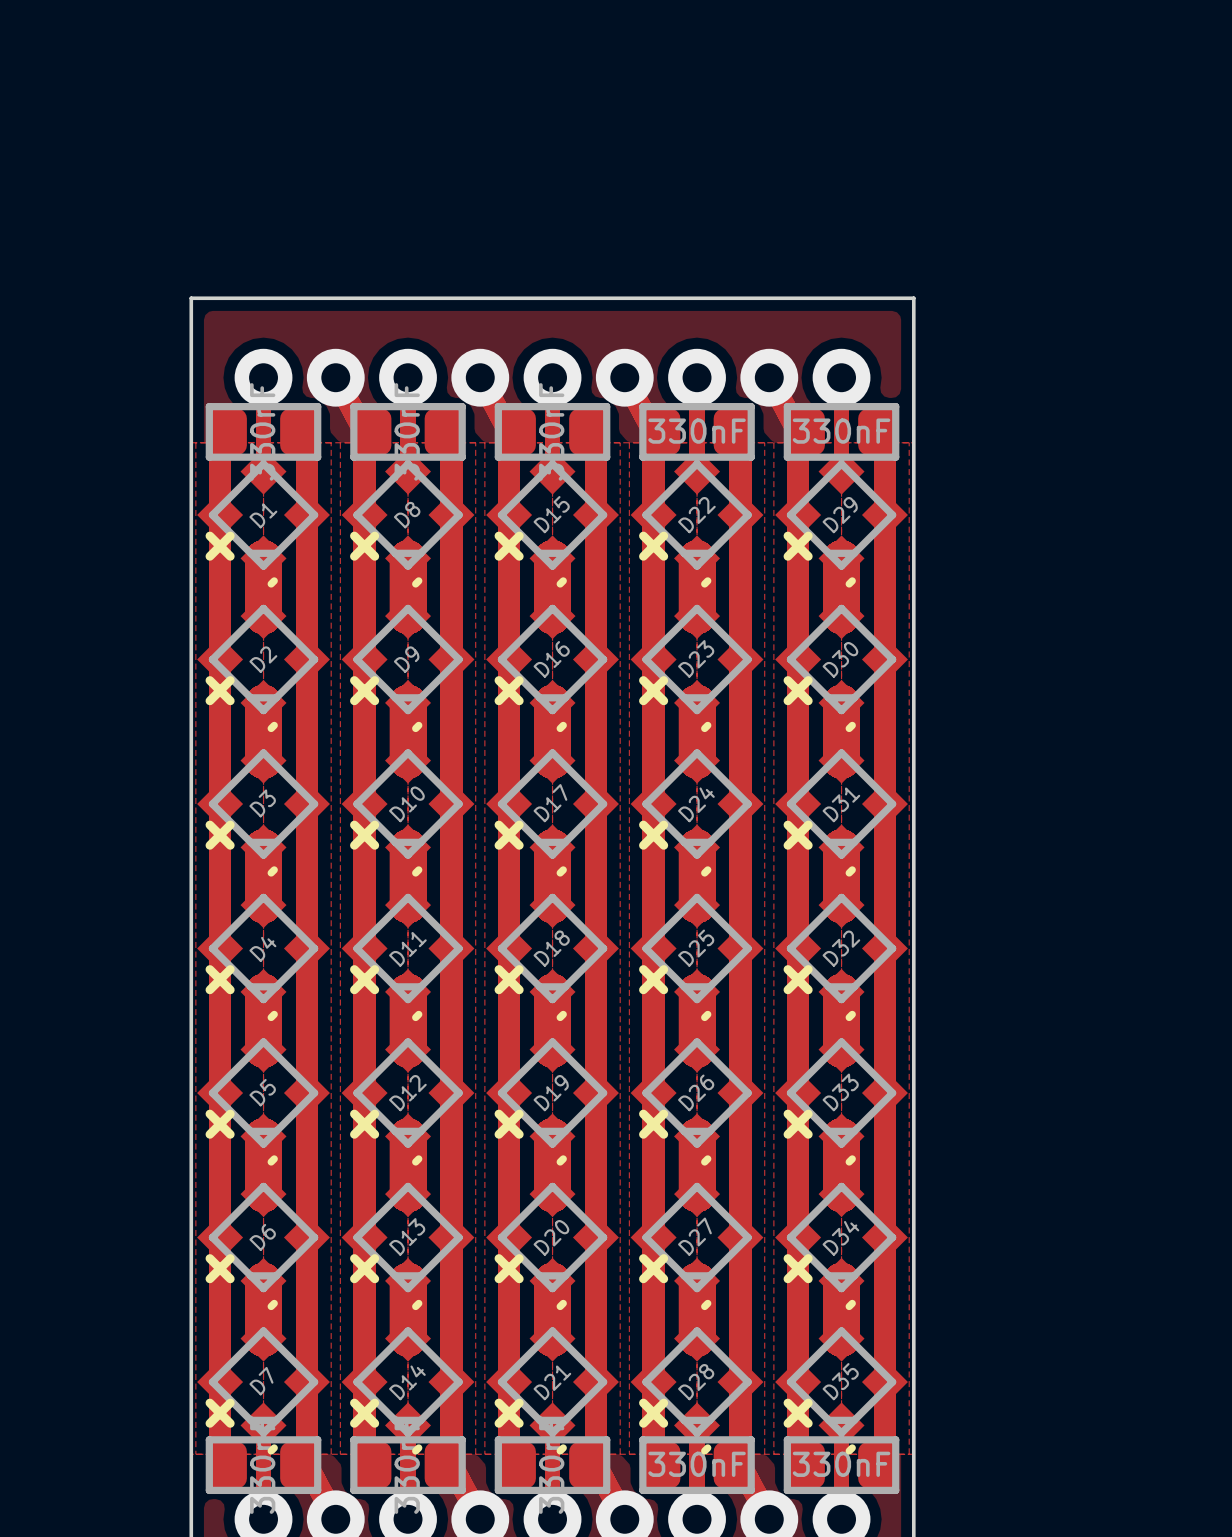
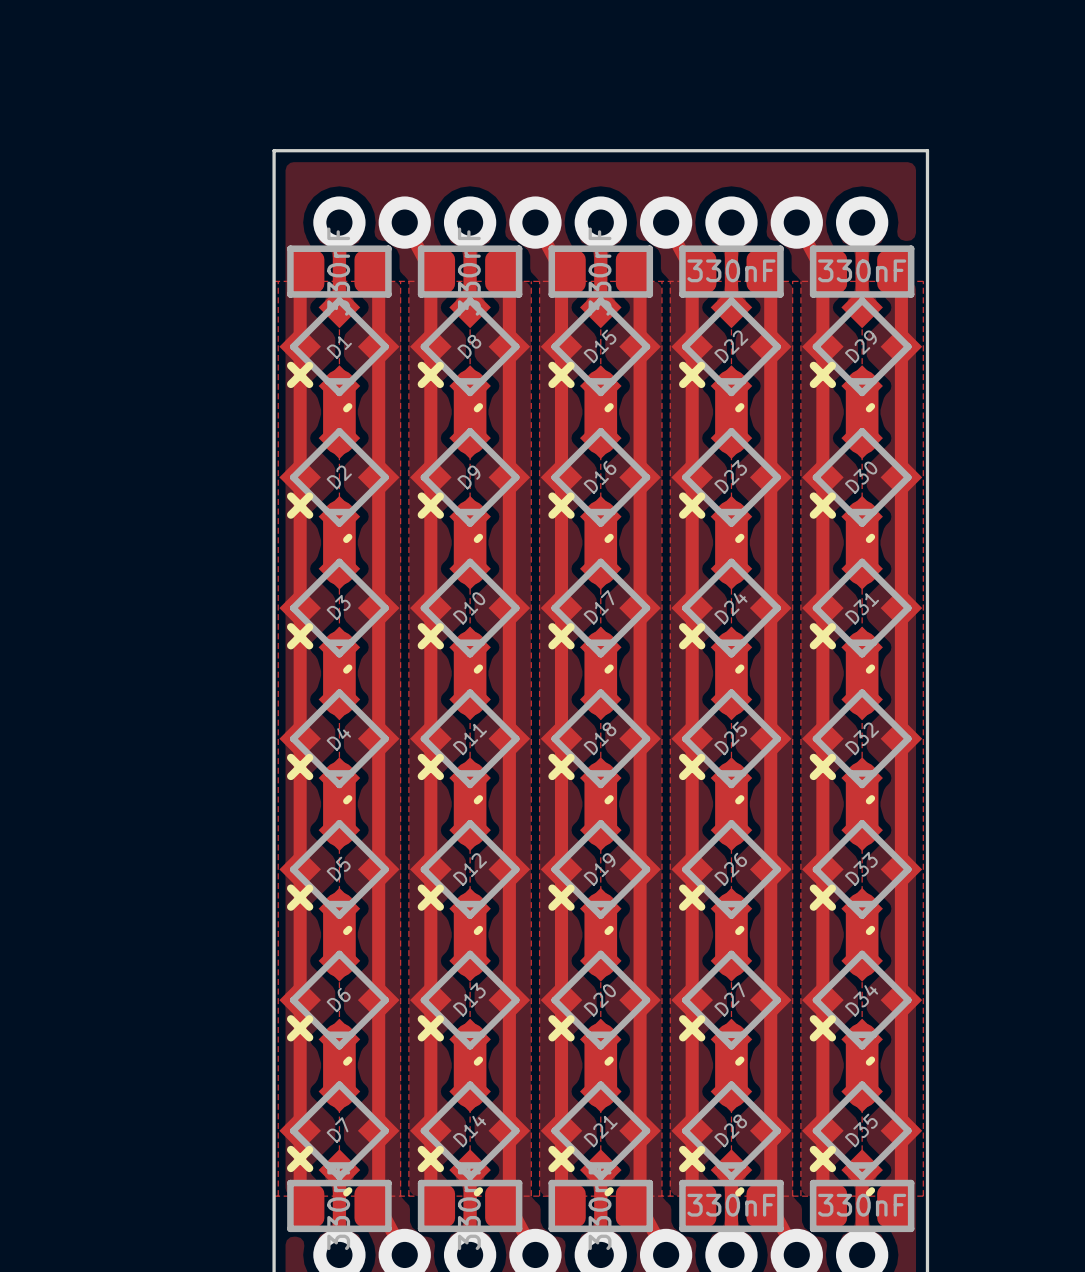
track width: thick (335, 377) (364, 431) (364, 1465) -> thin (404, 222) (430, 271) (430, 1205)
track width: thick (480, 377) (509, 431) (509, 1465) -> thin (535, 222) (561, 271) (561, 1205)
track width: thick (624, 377) (653, 431) (653, 1465) -> thin (666, 222) (692, 271) (692, 1205)
track width: thick (769, 377) (798, 431) (798, 1465) -> thin (796, 222) (822, 271) (822, 1205)
track width: thick (220, 431) (220, 1465) -> thin (300, 271) (300, 1205)
track width: thick (306, 431) (306, 1465) (335, 1519) -> thin (378, 271) (378, 1205) (404, 1254)
track width: thick (451, 431) (451, 1465) (480, 1519) -> thin (509, 271) (509, 1205) (535, 1254)
track width: thick (595, 431) (595, 1465) (624, 1519) -> thin (640, 271) (640, 1205) (666, 1254)
track width: thick (740, 431) (740, 1465) (769, 1519) -> thin (770, 271) (770, 1205) (796, 1254)
track width: thick (884, 431) (884, 1465) -> thin (901, 271) (901, 1205)

